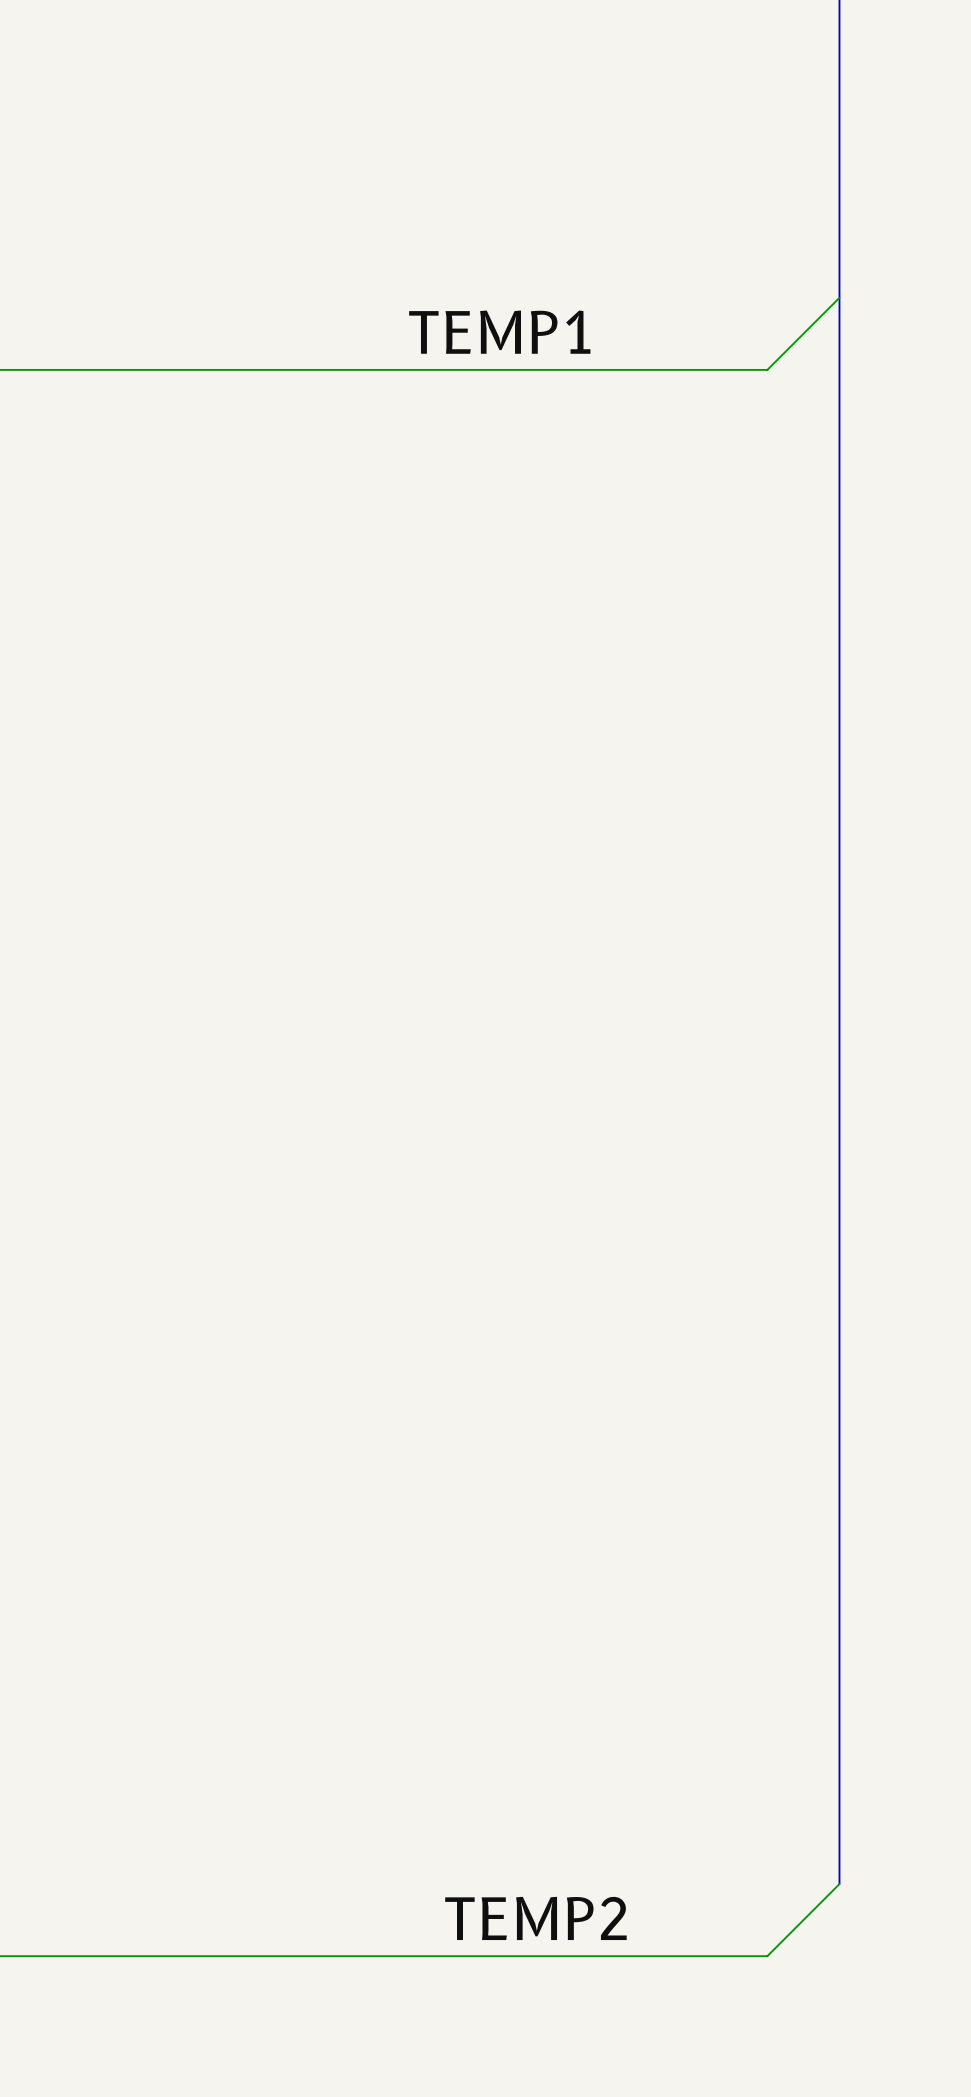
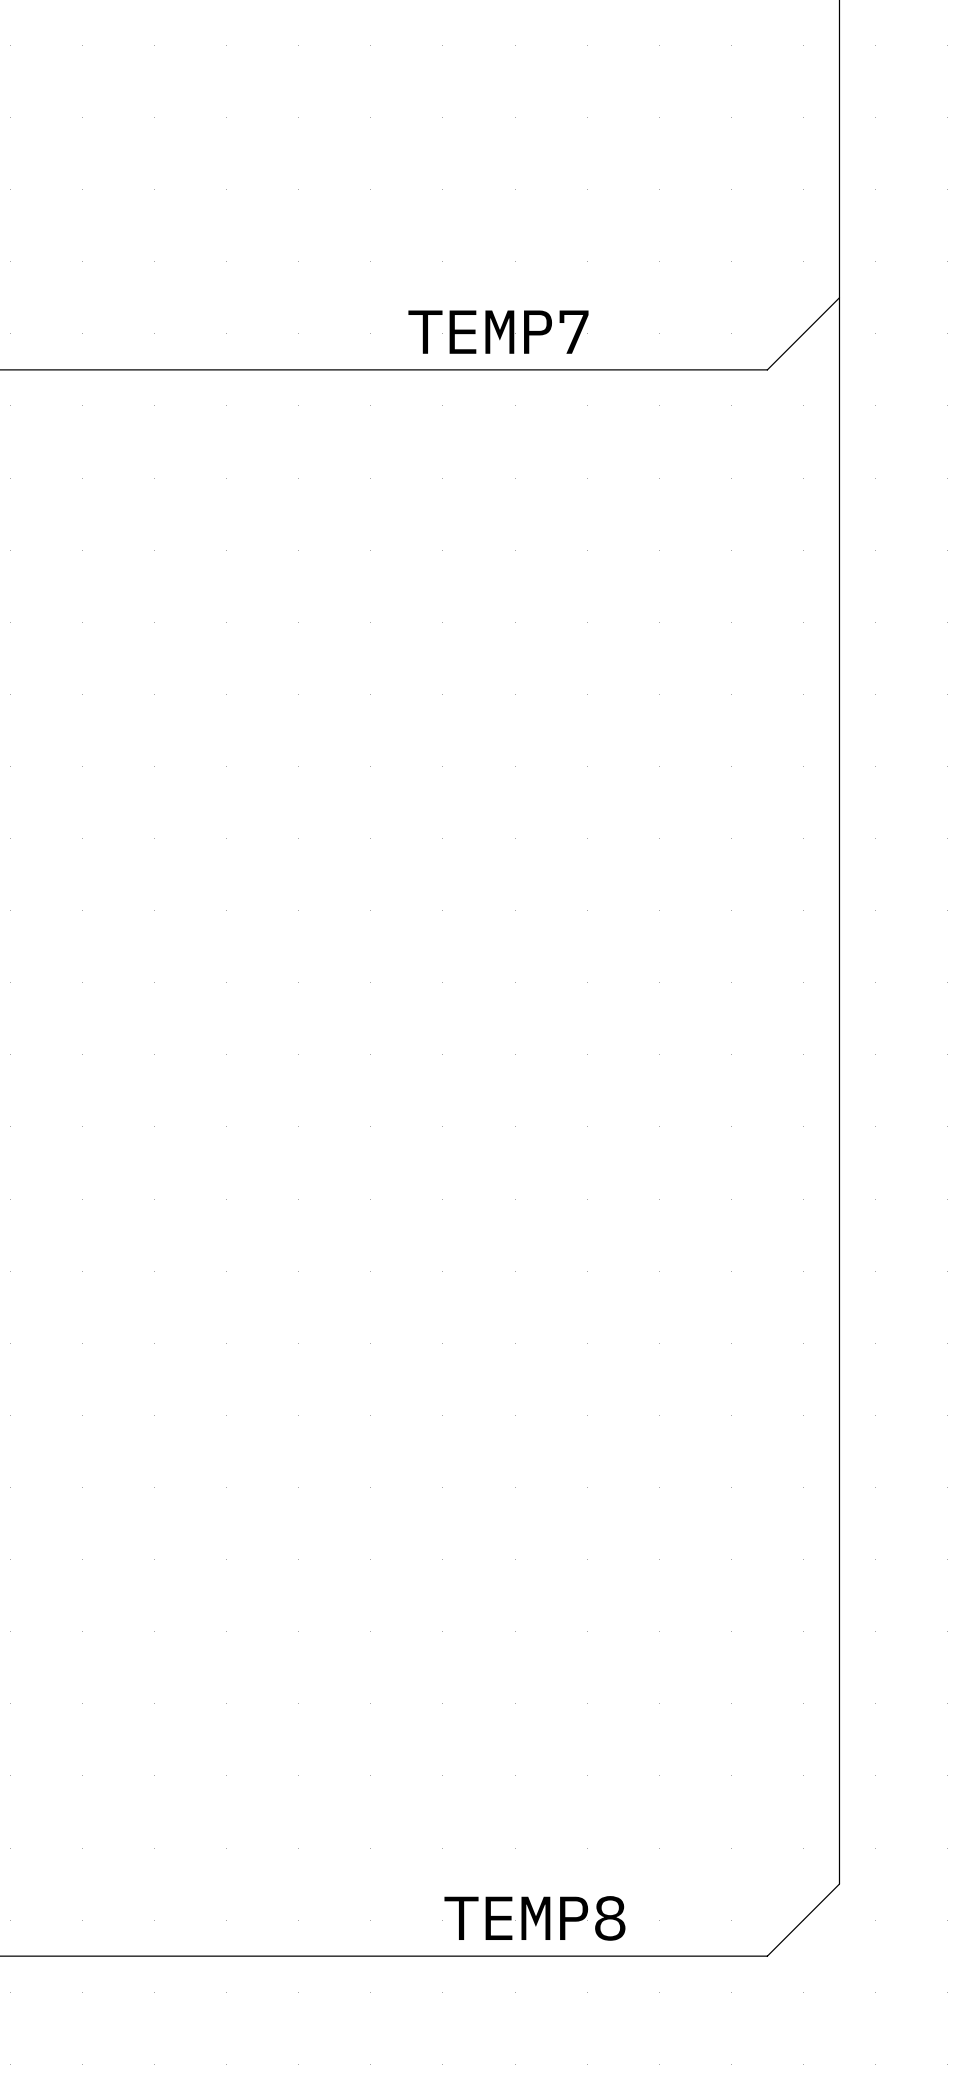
label: TEMP1 (499, 332) -> TEMP7 (498, 332)
label: TEMP2 (535, 1918) -> TEMP8 (534, 1918)

